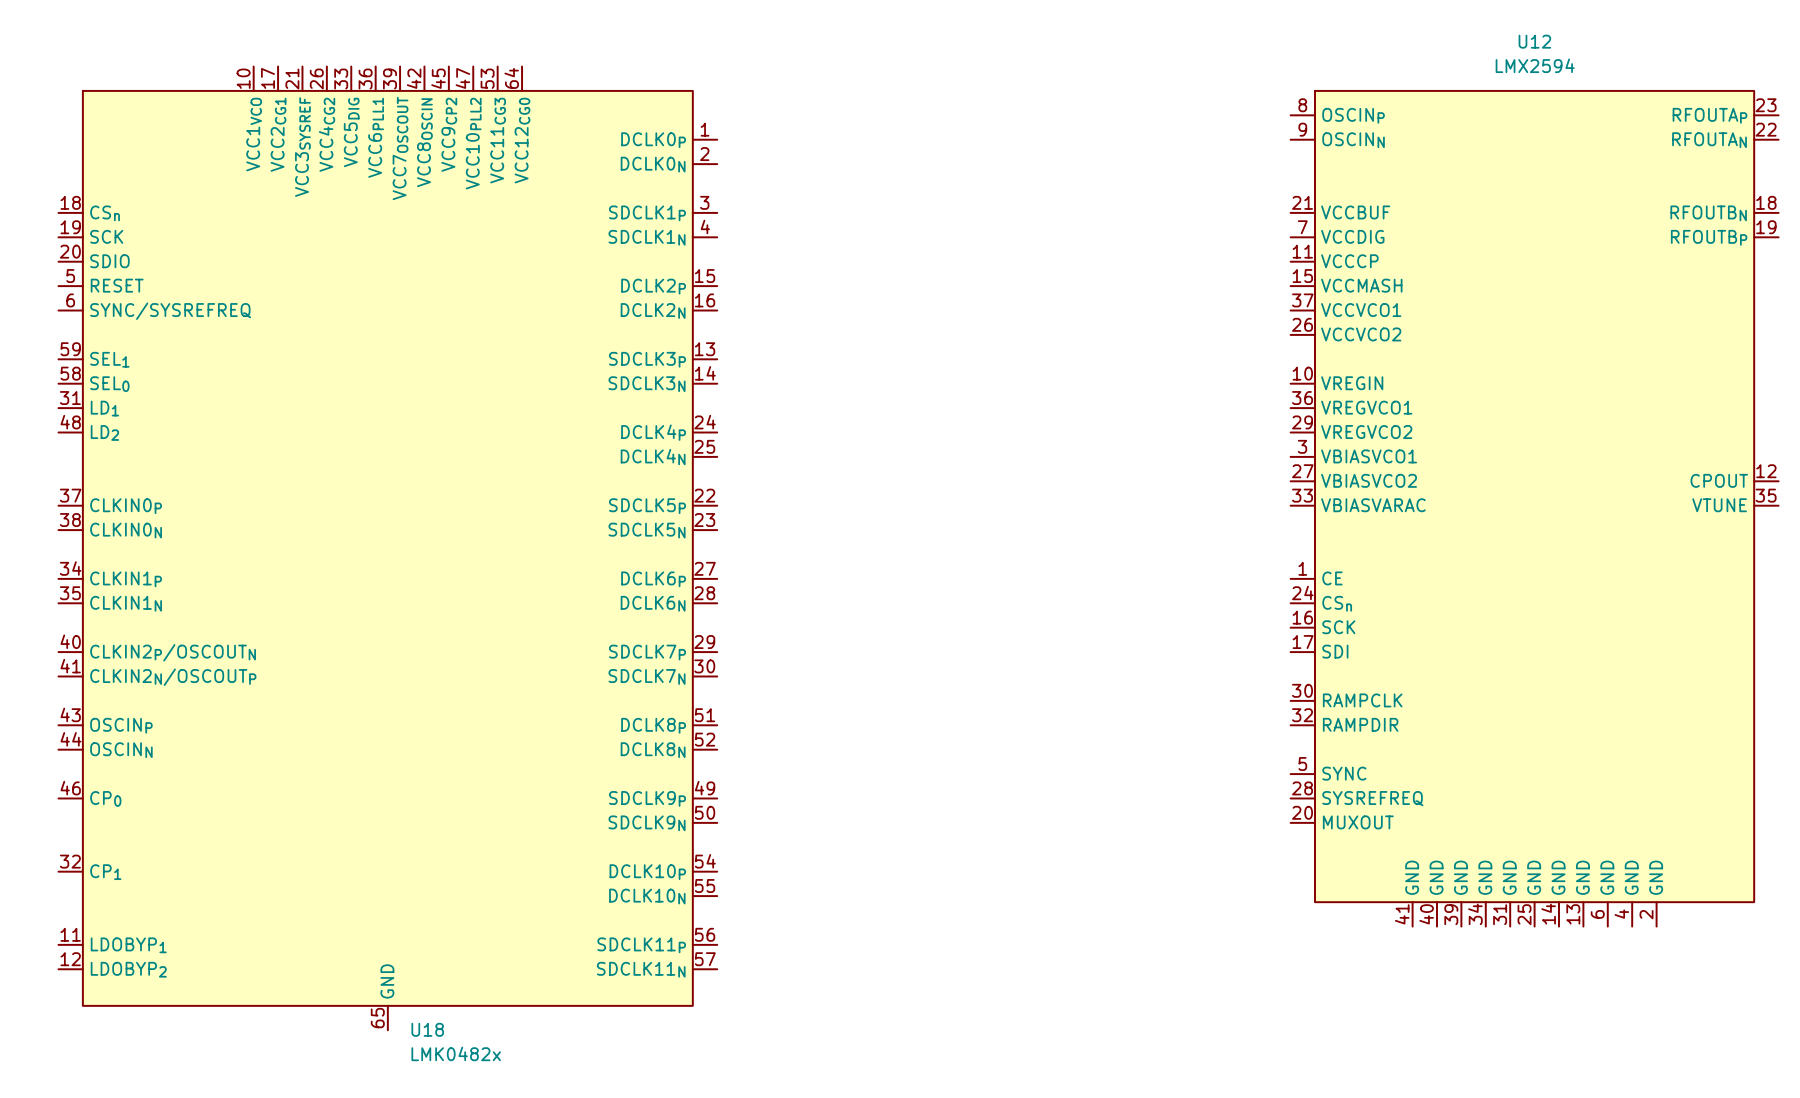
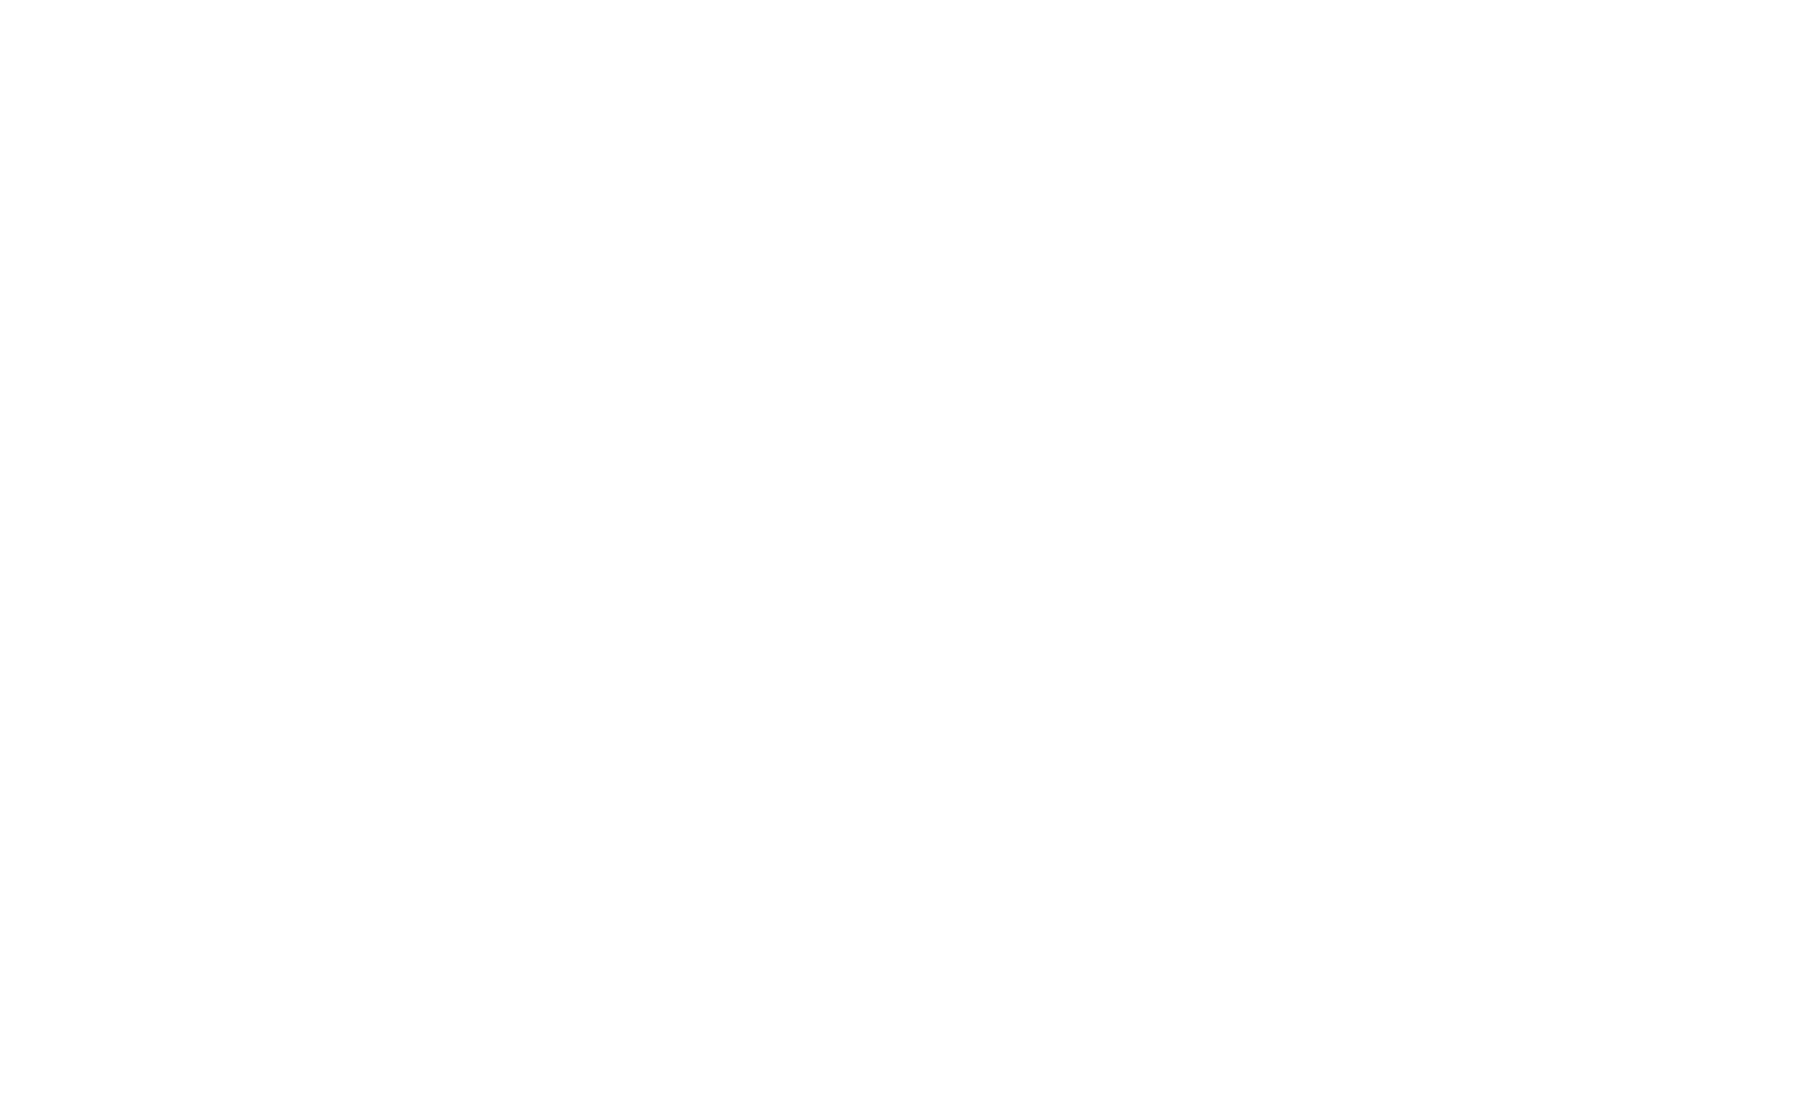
U12: LMX2594 (1534, 508) -> none
U18: LMK0482x (387, 548) -> none

